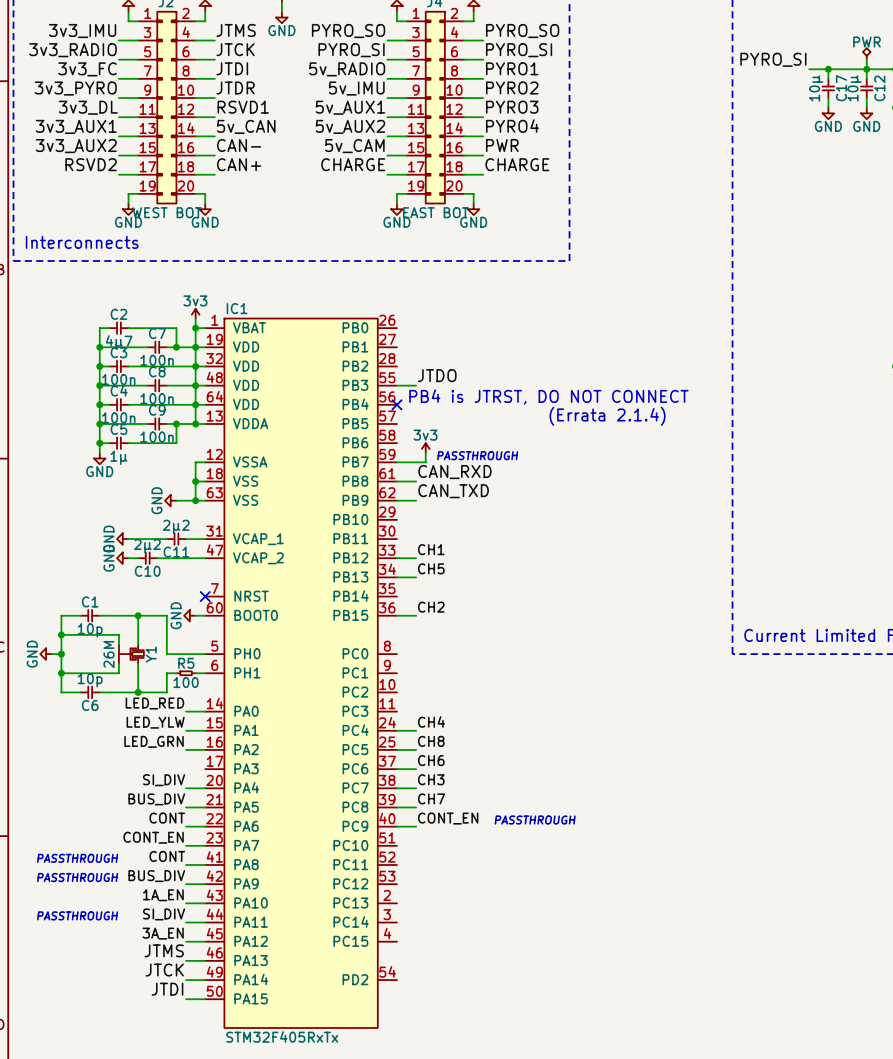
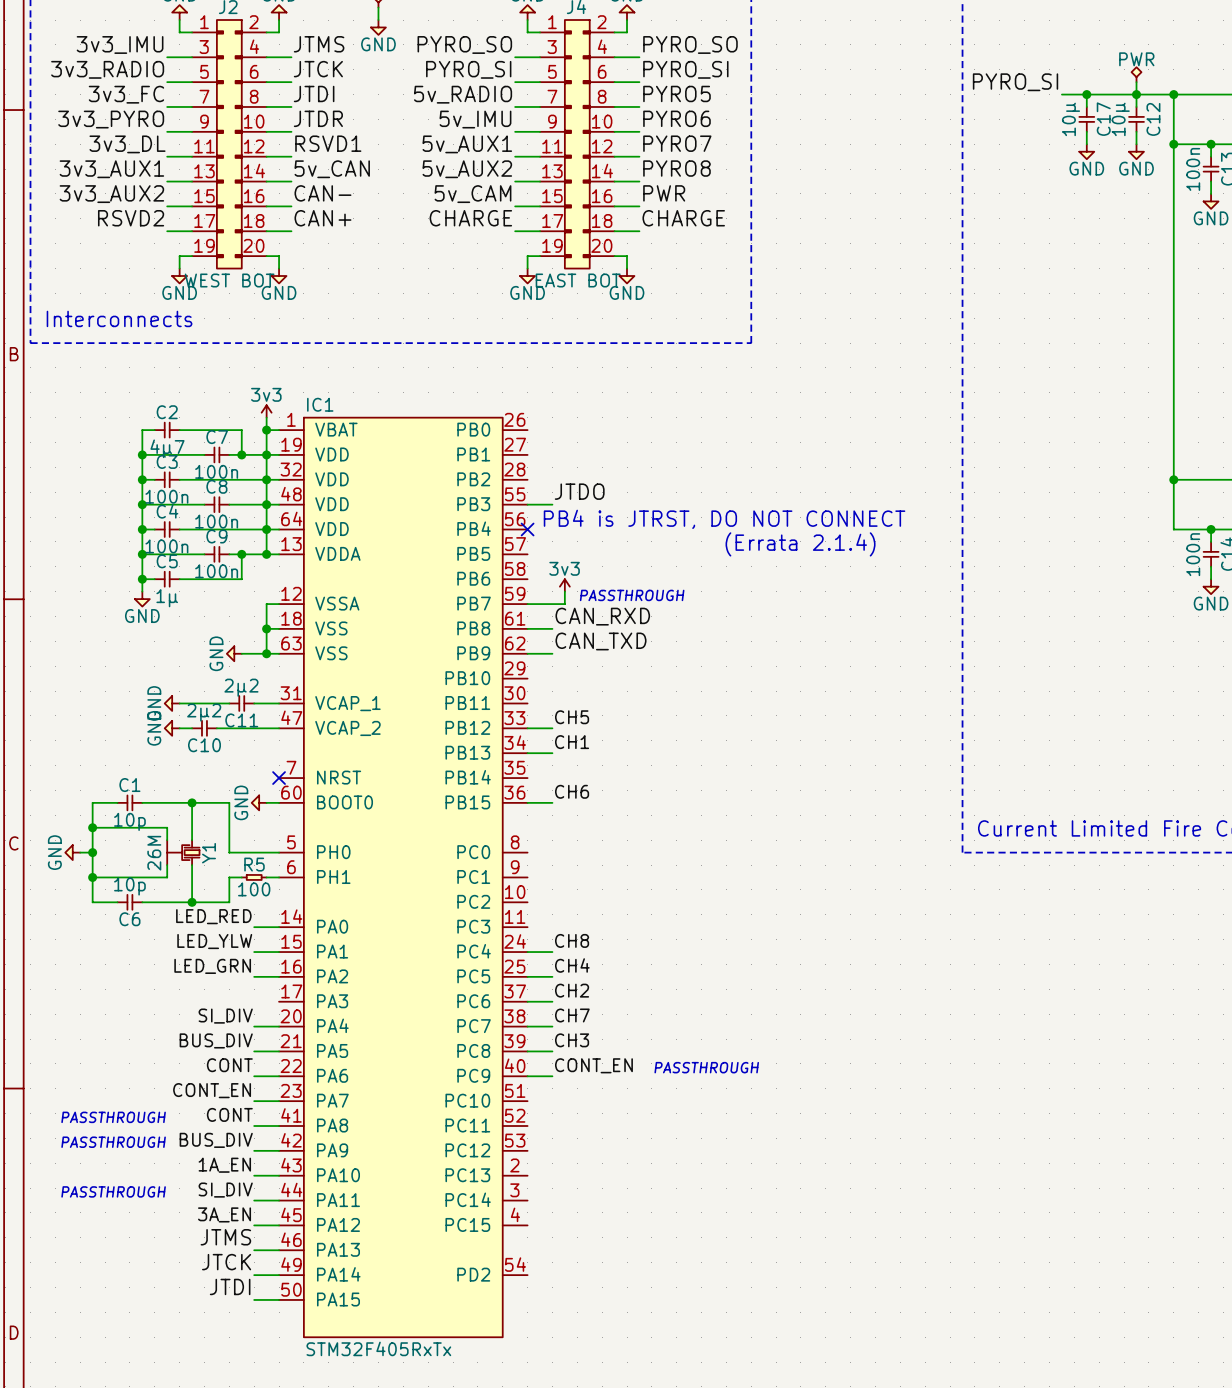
label: PYRO1 (512, 68) -> PYRO5 (676, 93)
label: PYRO2 (512, 87) -> PYRO6 (676, 118)
label: PYRO3 (512, 107) -> PYRO7 (677, 143)
label: PYRO4 (512, 126) -> PYRO8 (676, 168)
label: CH1 (431, 549) -> CH5 (572, 717)
label: CH5 (431, 568) -> CH1 (572, 742)
label: CH2 (431, 607) -> CH6 (572, 791)
label: CH4 (431, 722) -> CH8 (572, 940)
label: CH8 (431, 741) -> CH4 (572, 965)
label: CH6 (431, 760) -> CH2 (572, 990)
label: CH3 (431, 779) -> CH7 (572, 1015)
label: CH7 (431, 798) -> CH3 (572, 1040)

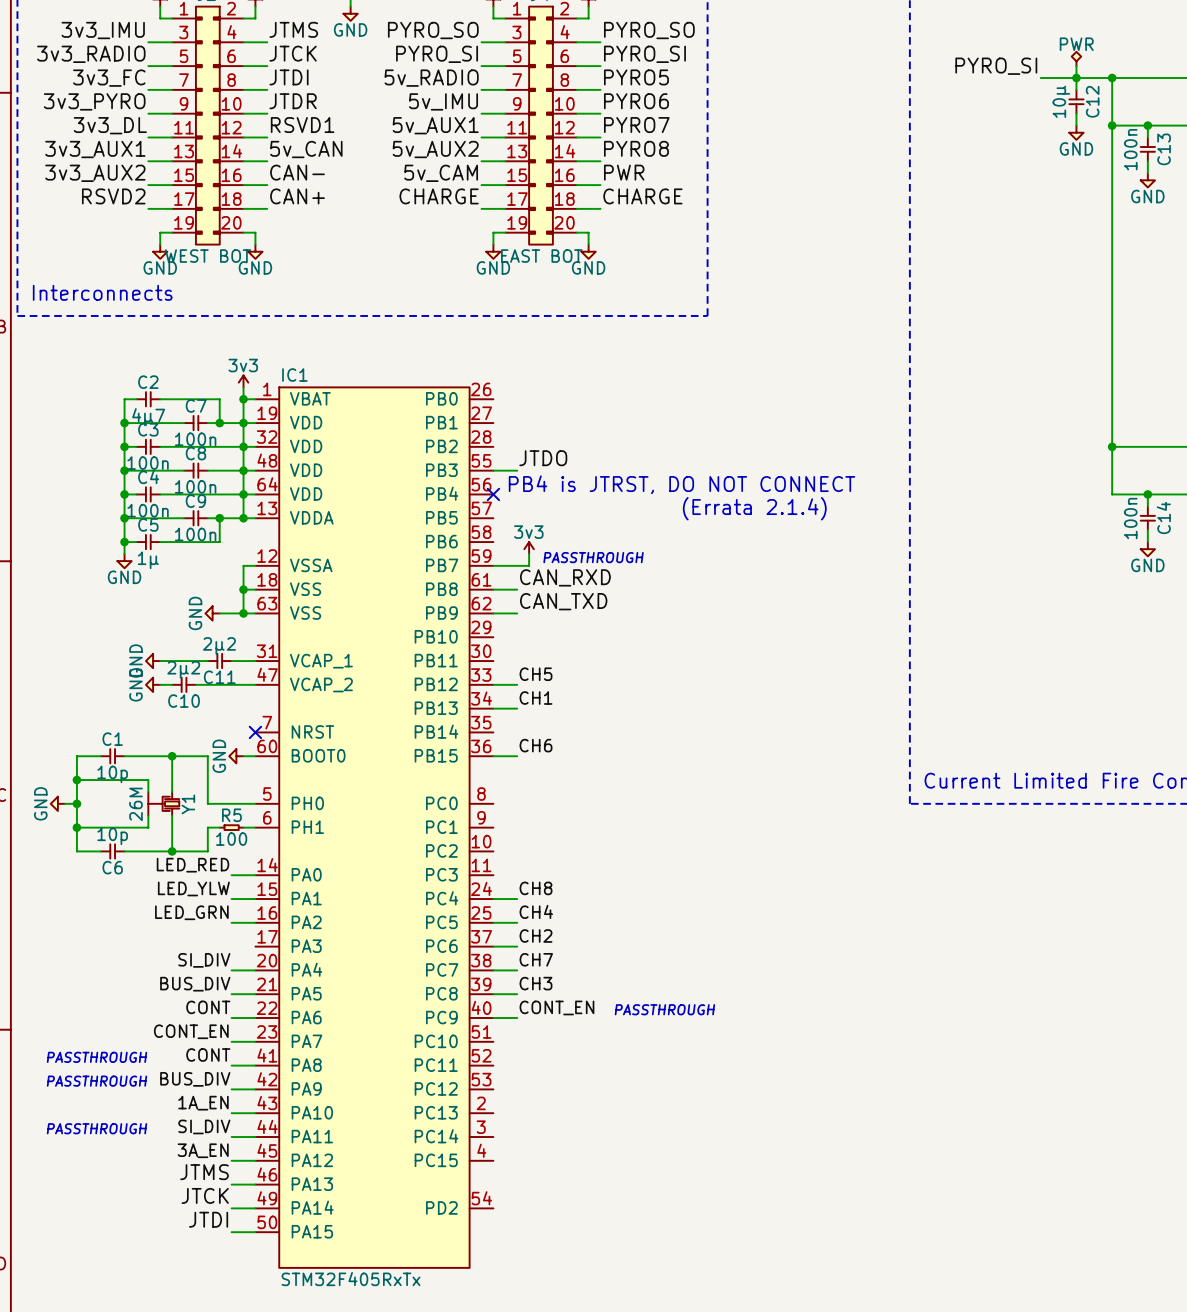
label position: PYRO_SI (1015, 82) -> PYRO_SI (996, 66)
wire: (1061, 94) (1099, 94) -> none
wire: (1086, 94) (1086, 106) -> none
junction: (1086, 94) -> none
C17: 10µ (1086, 119) -> none
wire: (1086, 131) (1086, 144) -> none
power symbol: GND (1086, 151) -> none

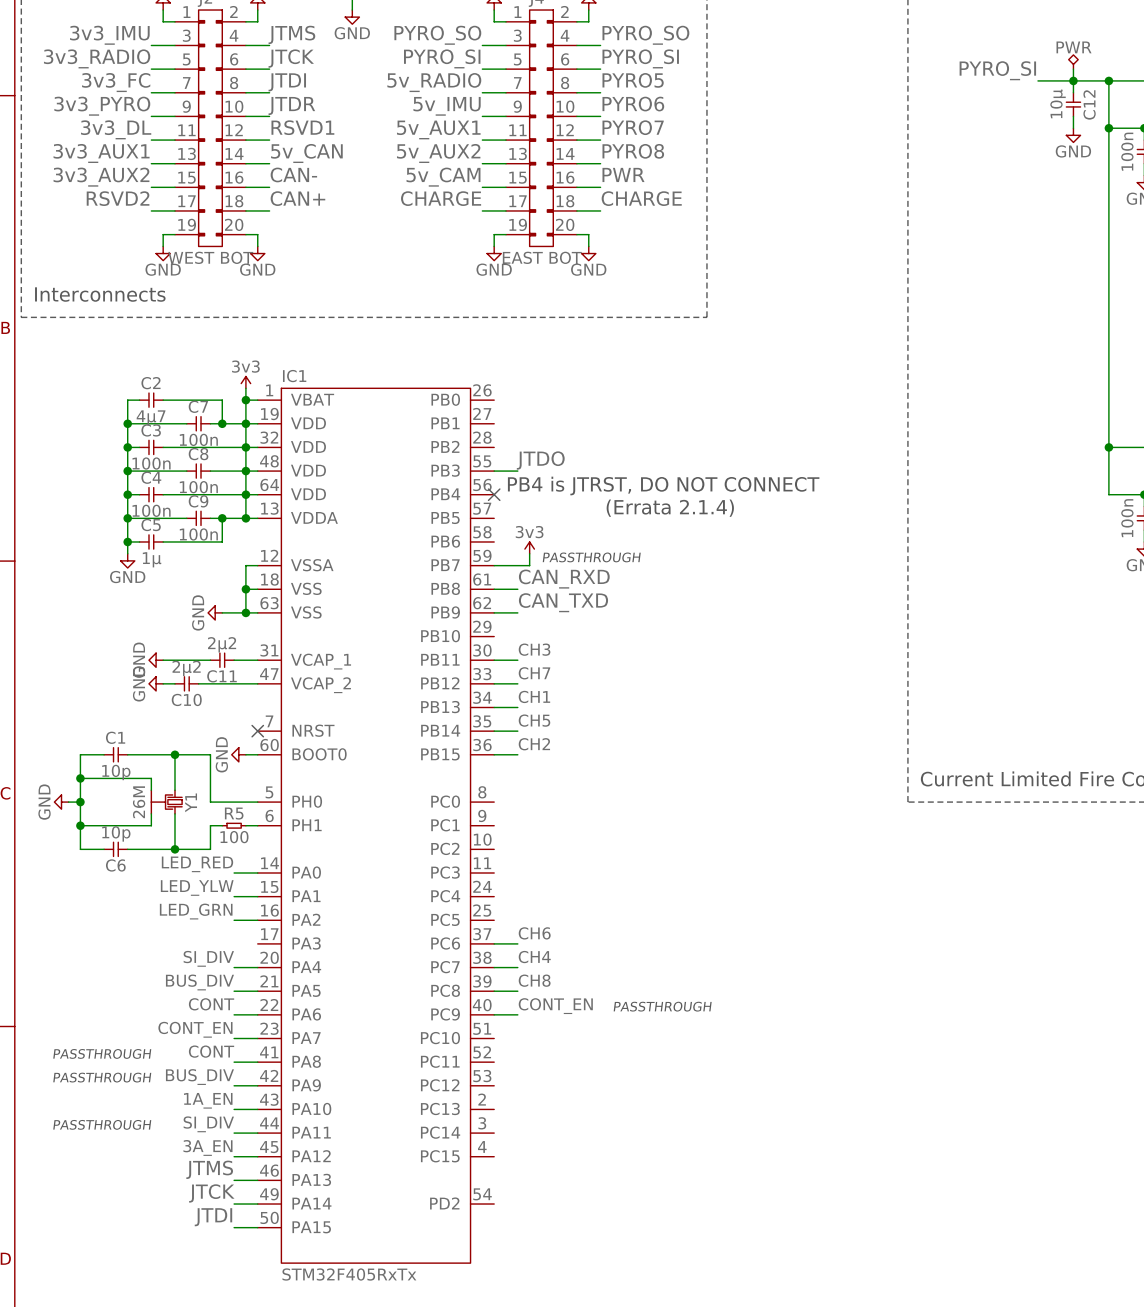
label: none -> CH3 (534, 649)
wire: none -> (494, 660) (517, 660)
label: CH5 (535, 674) -> CH7 (534, 673)
label: none -> CH5 (534, 720)
label: CH6 (535, 745) -> CH2 (534, 744)
label: CH8 (535, 888) -> none
wire: (493, 899) (517, 899) -> (494, 731) (517, 731)
label: CH4 (536, 911) -> none
wire: (493, 922) (517, 922) -> none
label: CH2 (535, 936) -> CH6 (534, 933)
label: CH7 (536, 959) -> CH4 (534, 957)
label: CH3 (535, 983) -> CH8 (534, 980)

